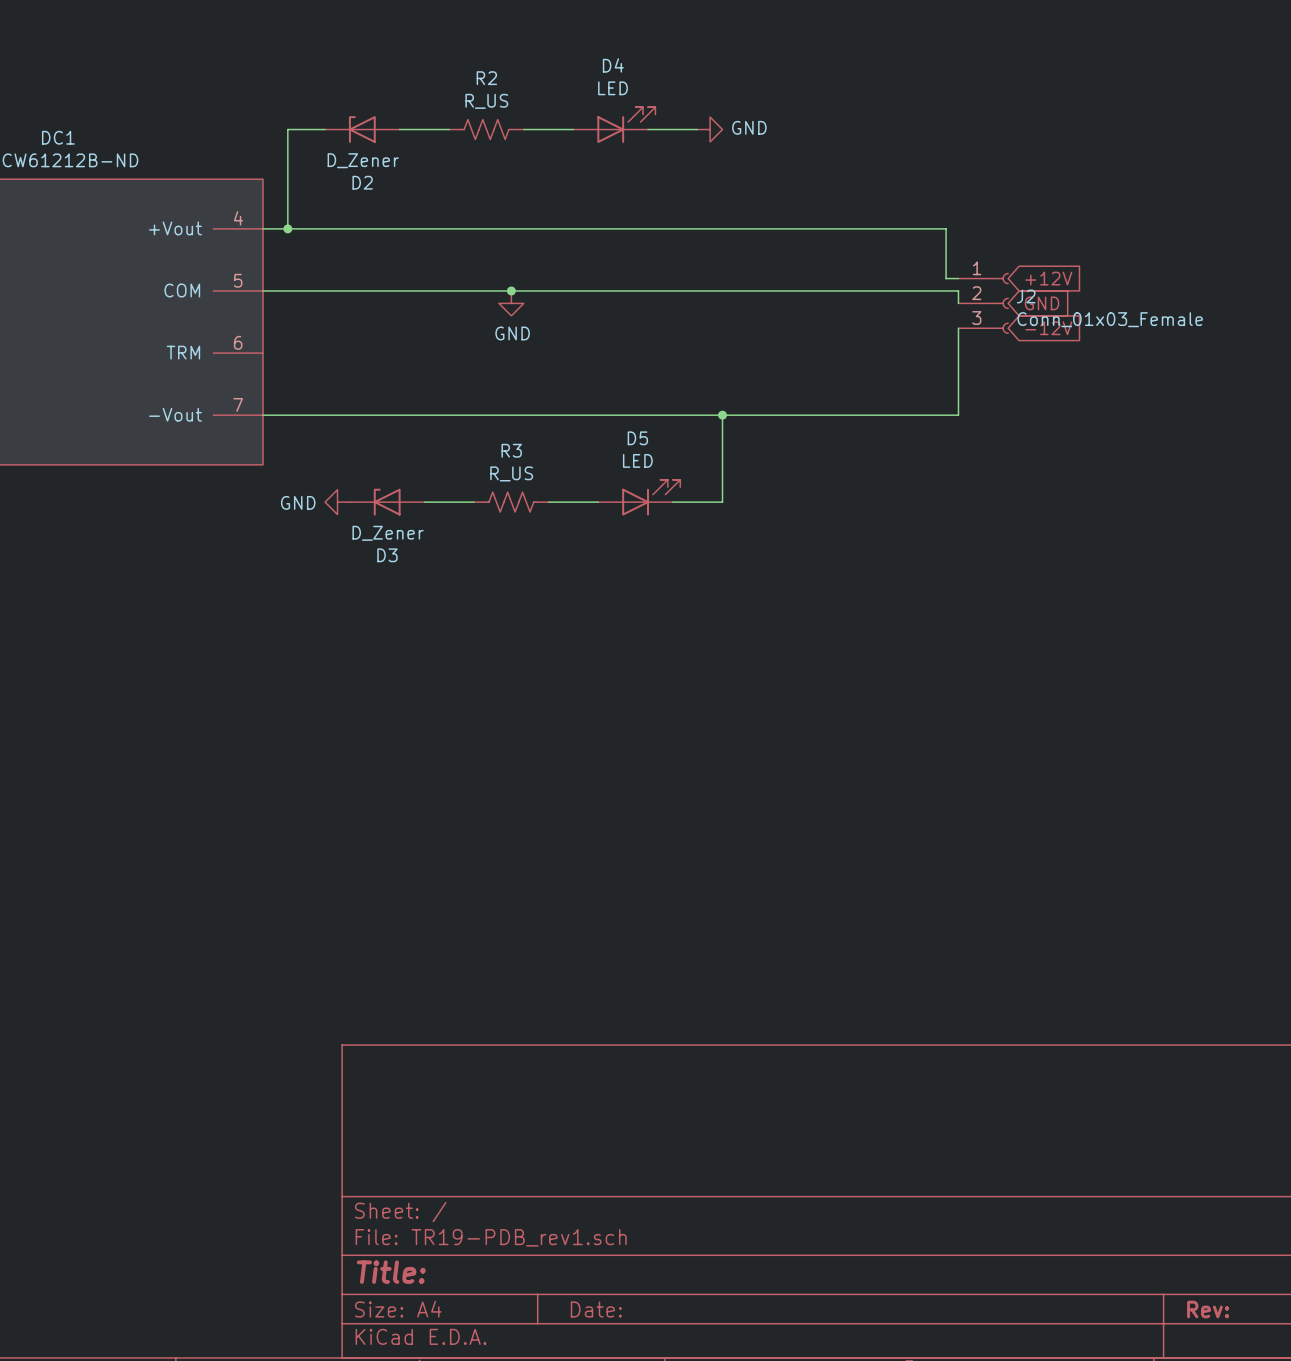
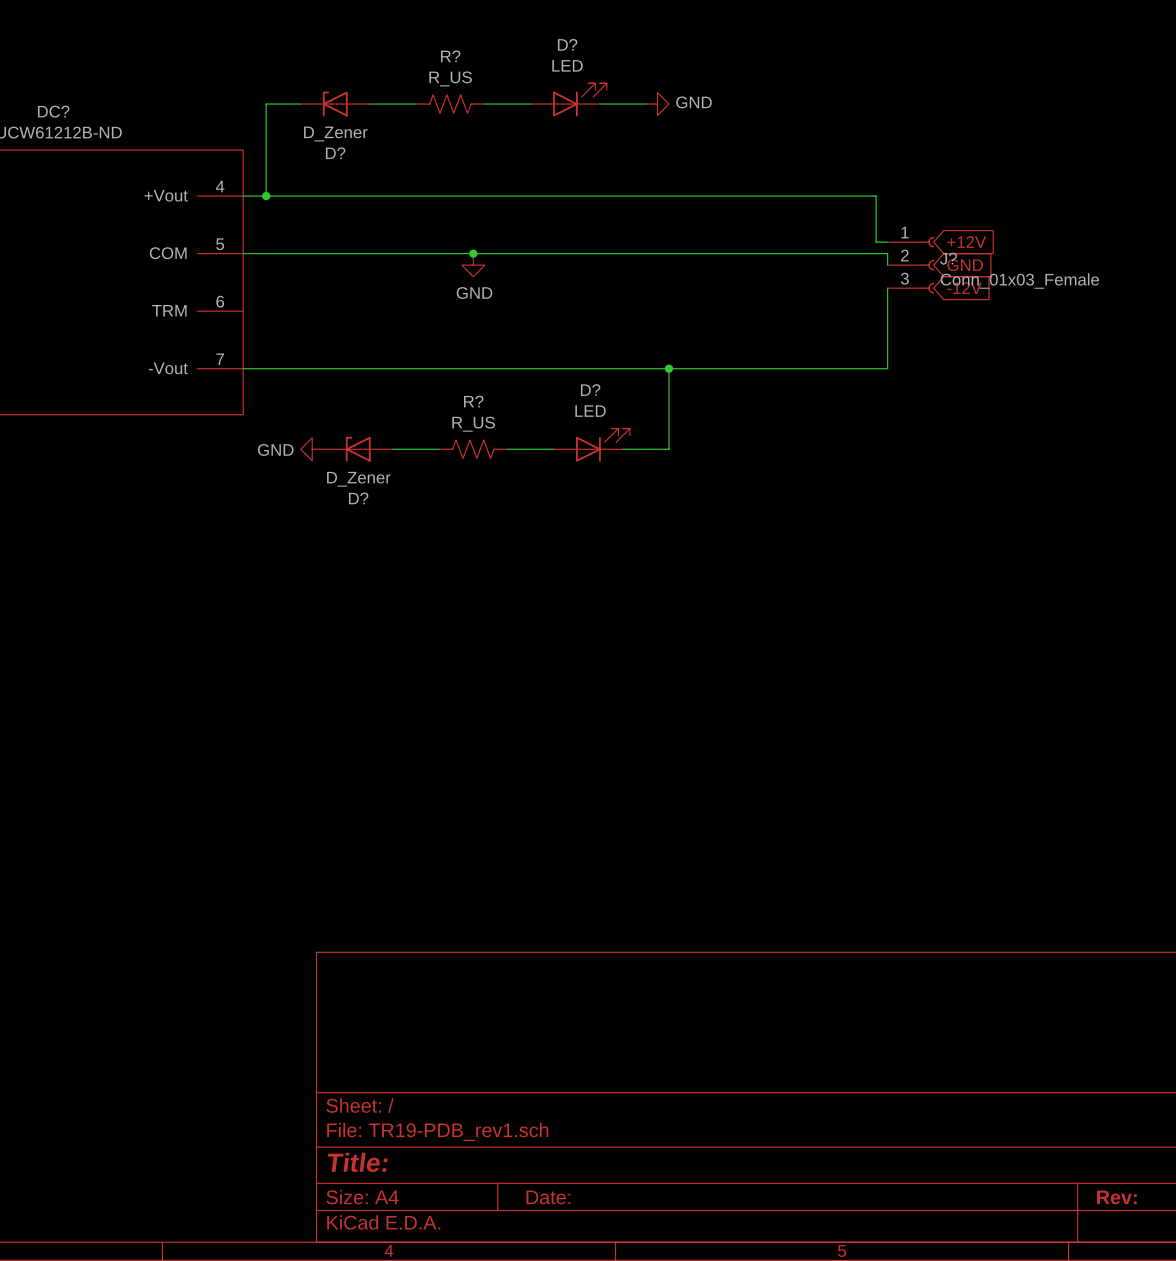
D4 name: D4 (613, 65) -> D? (567, 44)
R2 name: R2 (486, 78) -> R? (450, 56)
DC1 name: DC1 (58, 137) -> DC? (53, 111)
D2 name: D2 (362, 182) -> D? (335, 153)
J2 name: J2 (1026, 296) -> J? (948, 258)
D5 name: D5 (637, 438) -> D? (590, 390)
R3 name: R3 (511, 450) -> R? (473, 401)
D3 name: D3 (387, 555) -> D? (358, 498)

